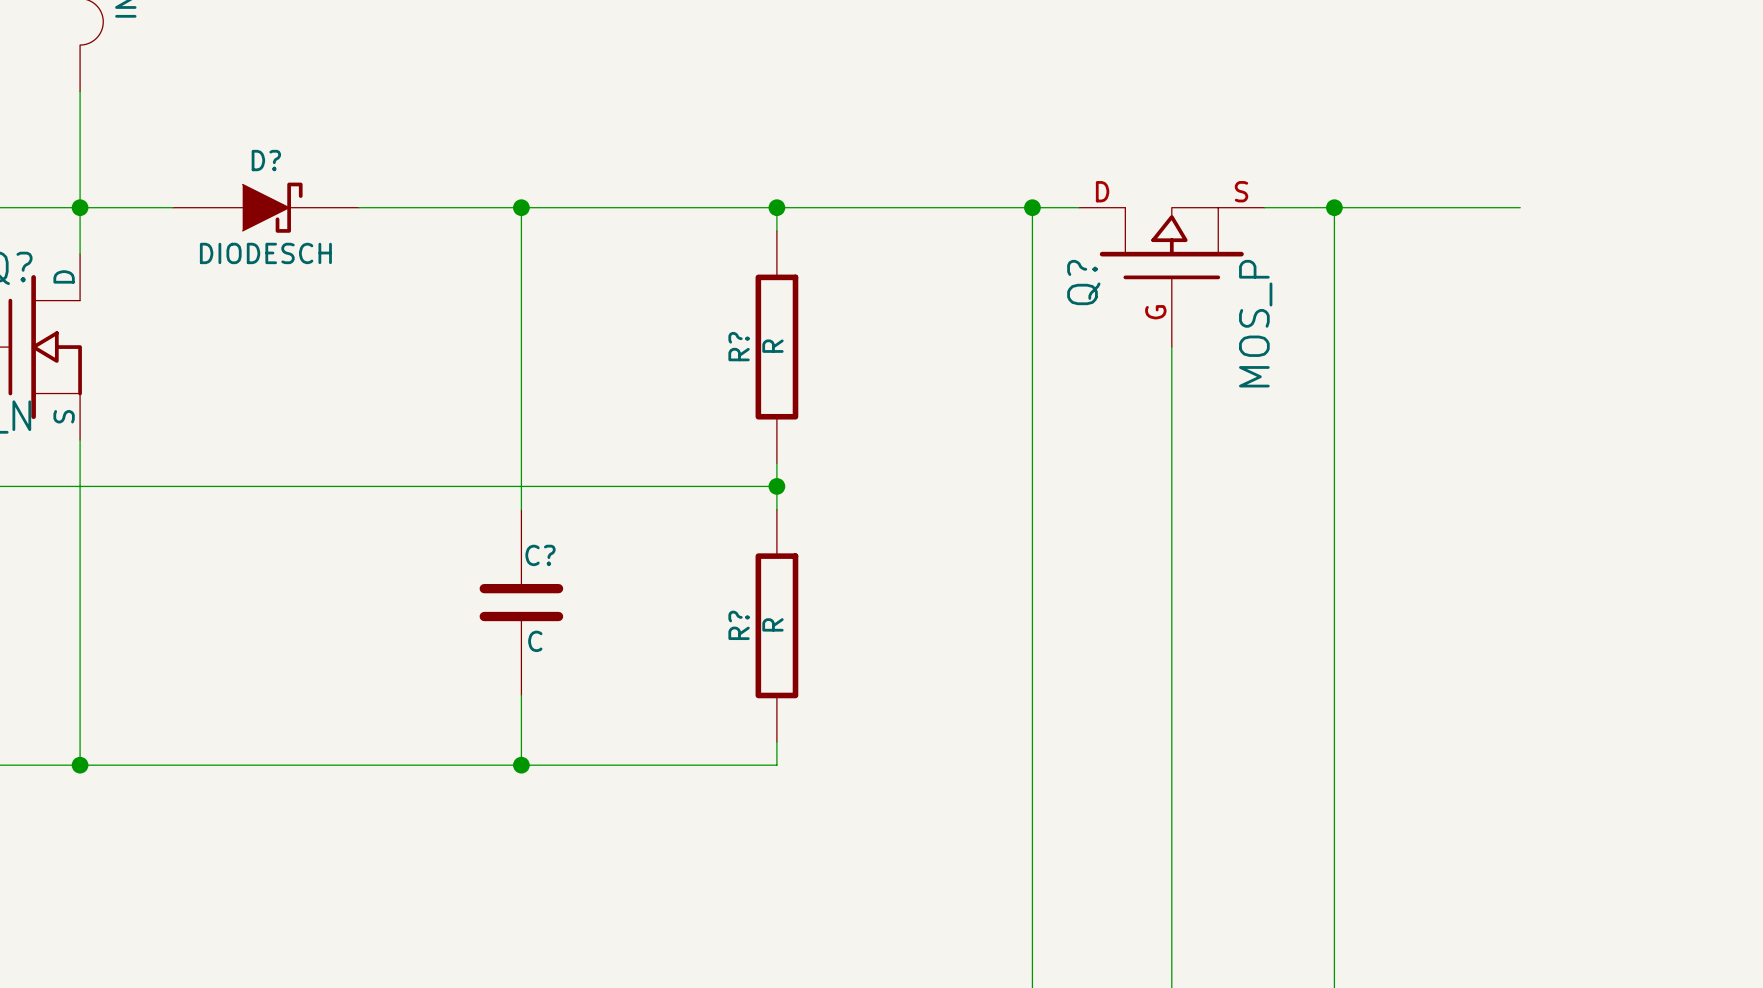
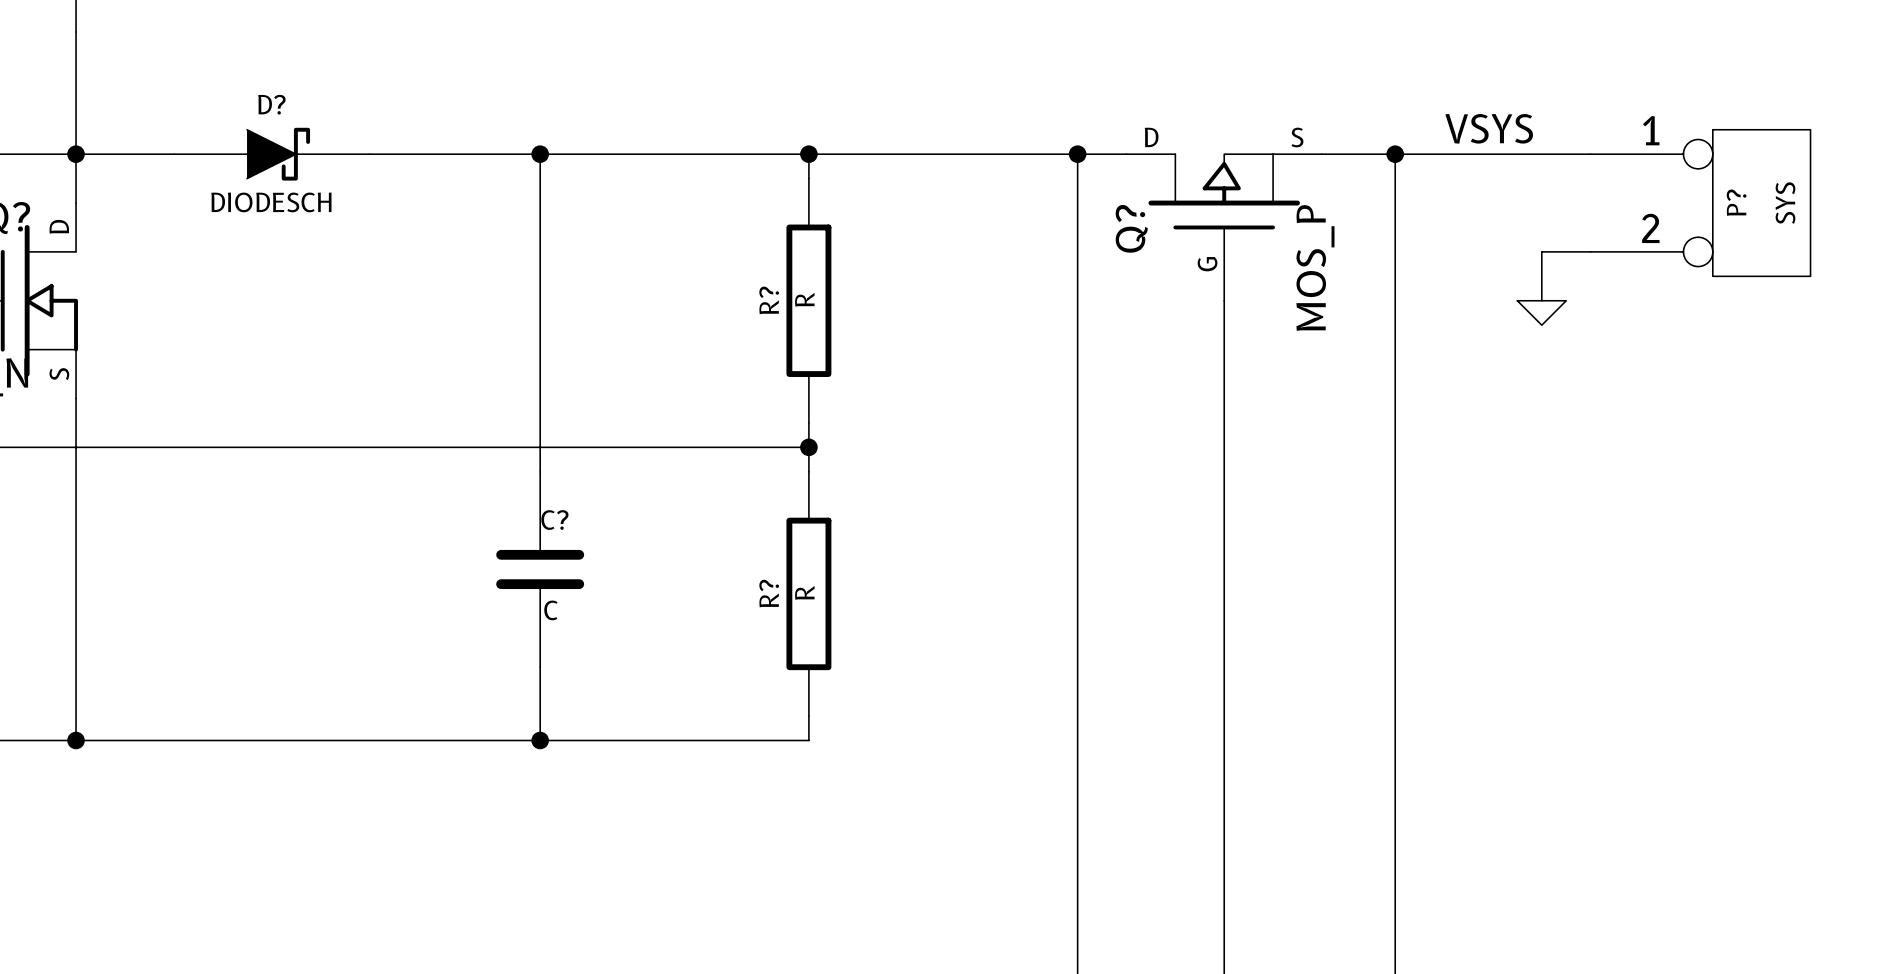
label: none -> VSYS (1489, 128)
P?: none -> SYS (1700, 203)
wire: none -> (1590, 251) (1541, 251) (1541, 300)
power symbol: none -> (1541, 312)

